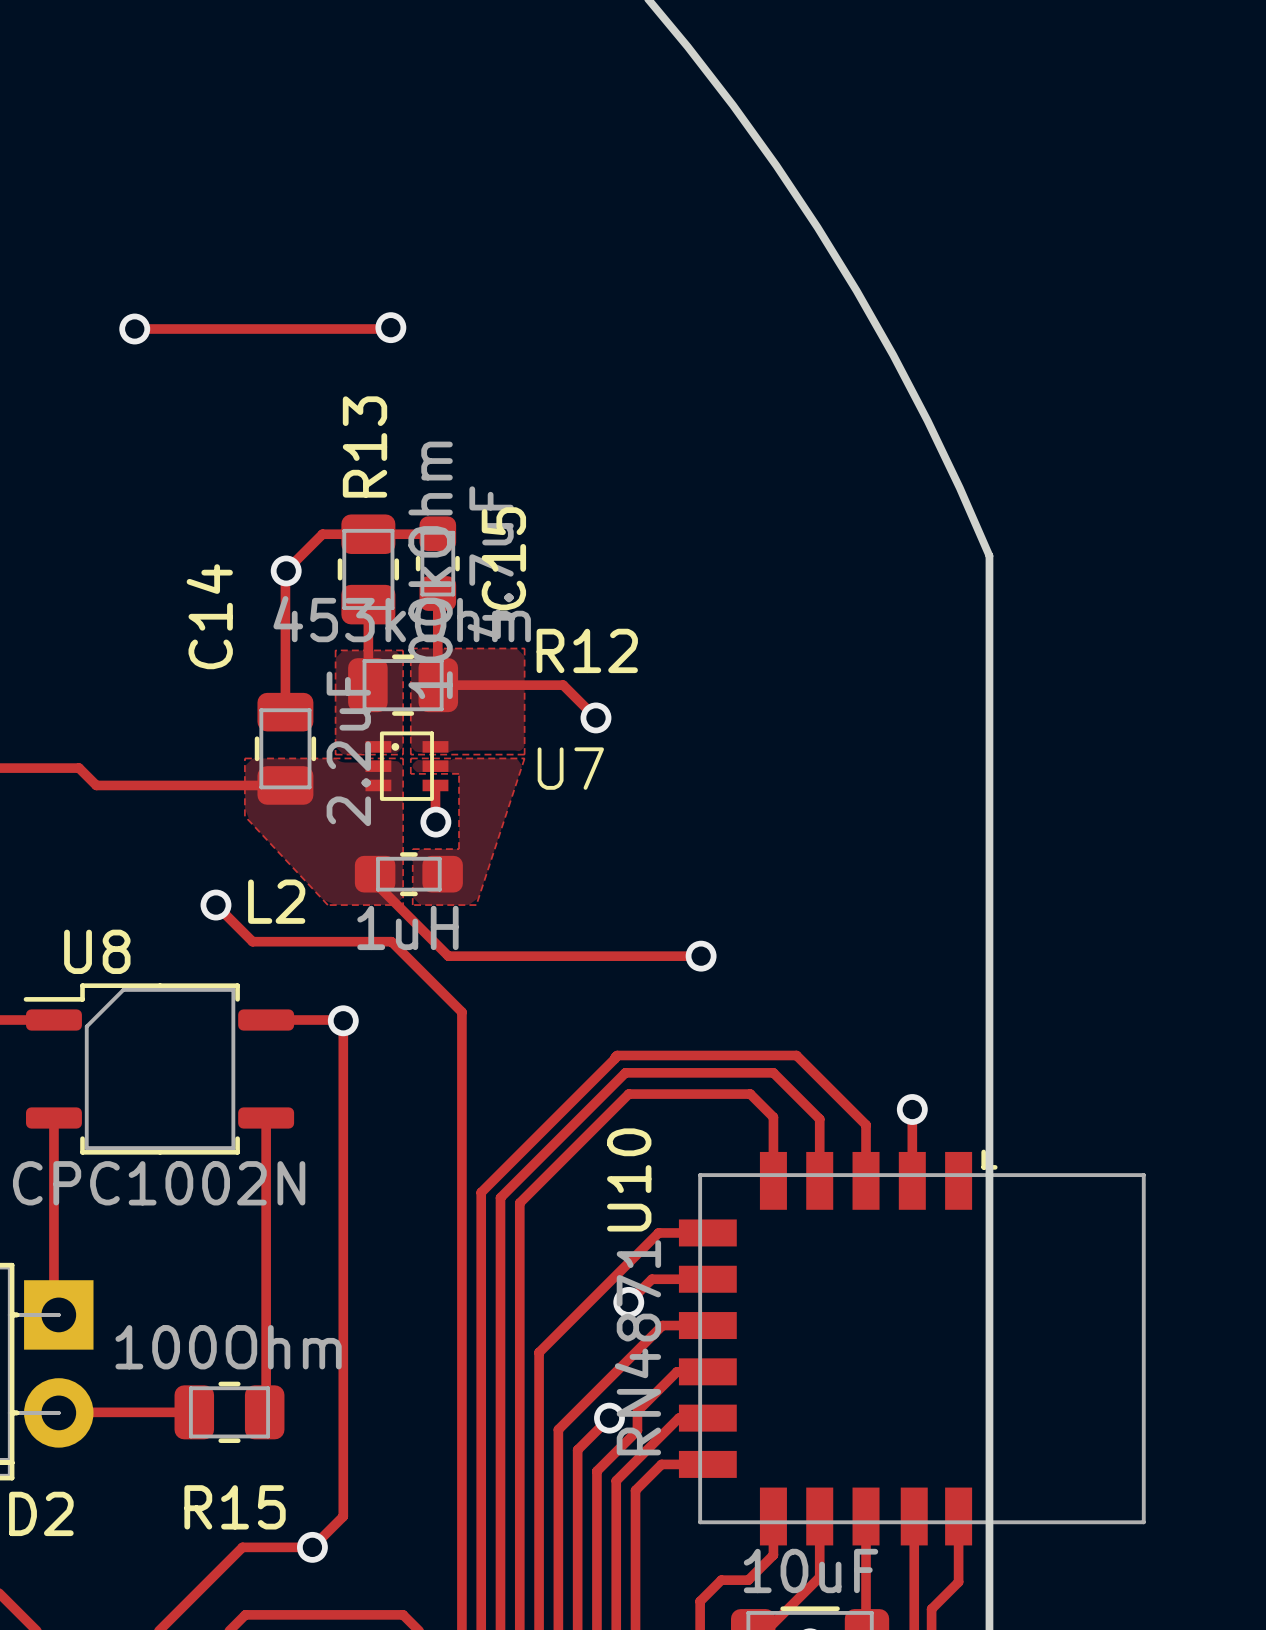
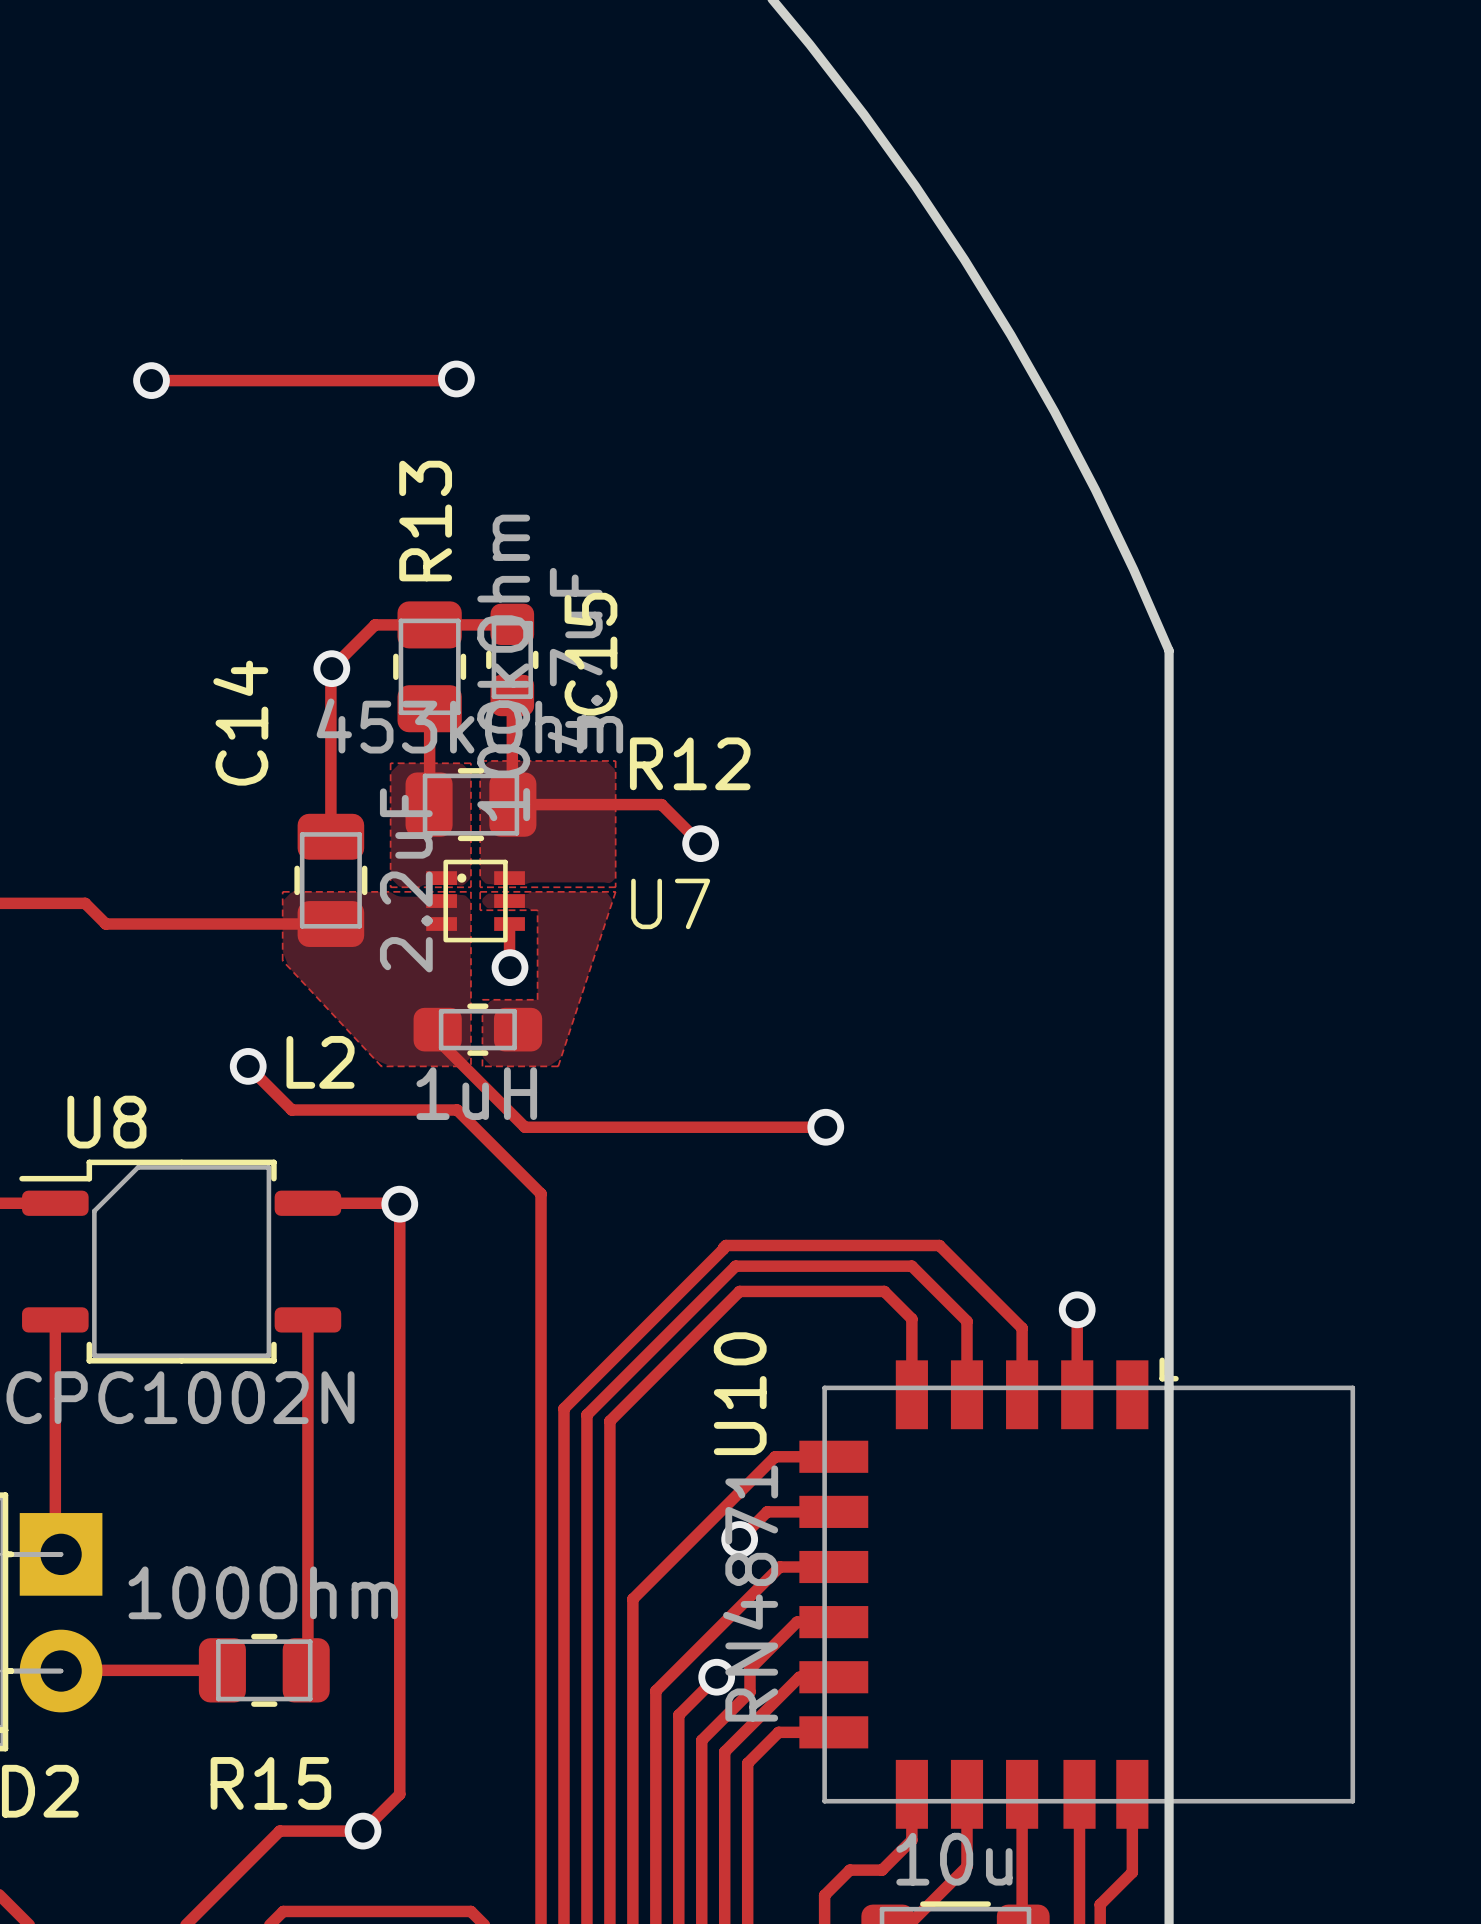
part value: 10uF (811, 1570) -> 10u (954, 1859)

